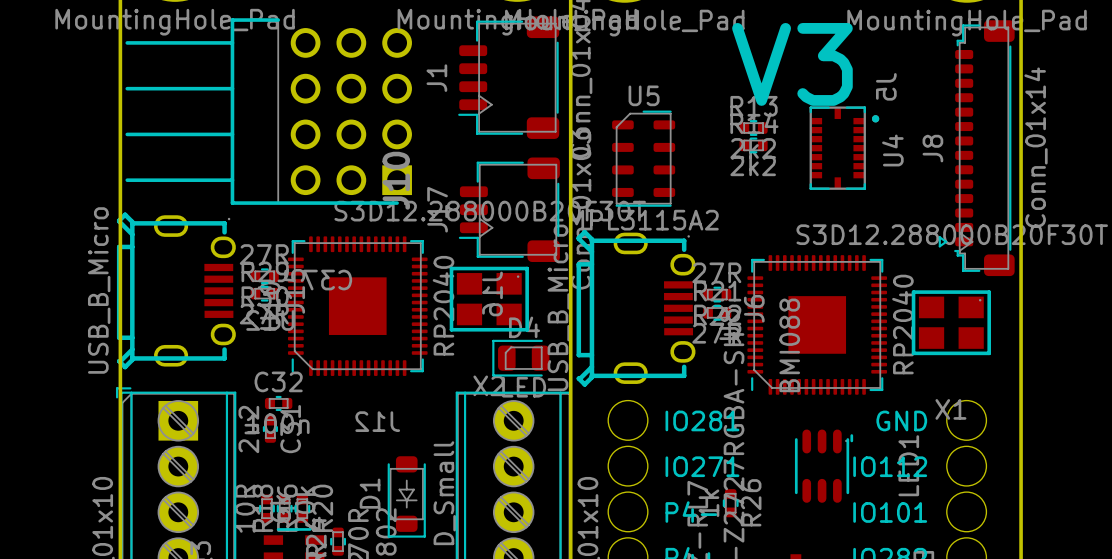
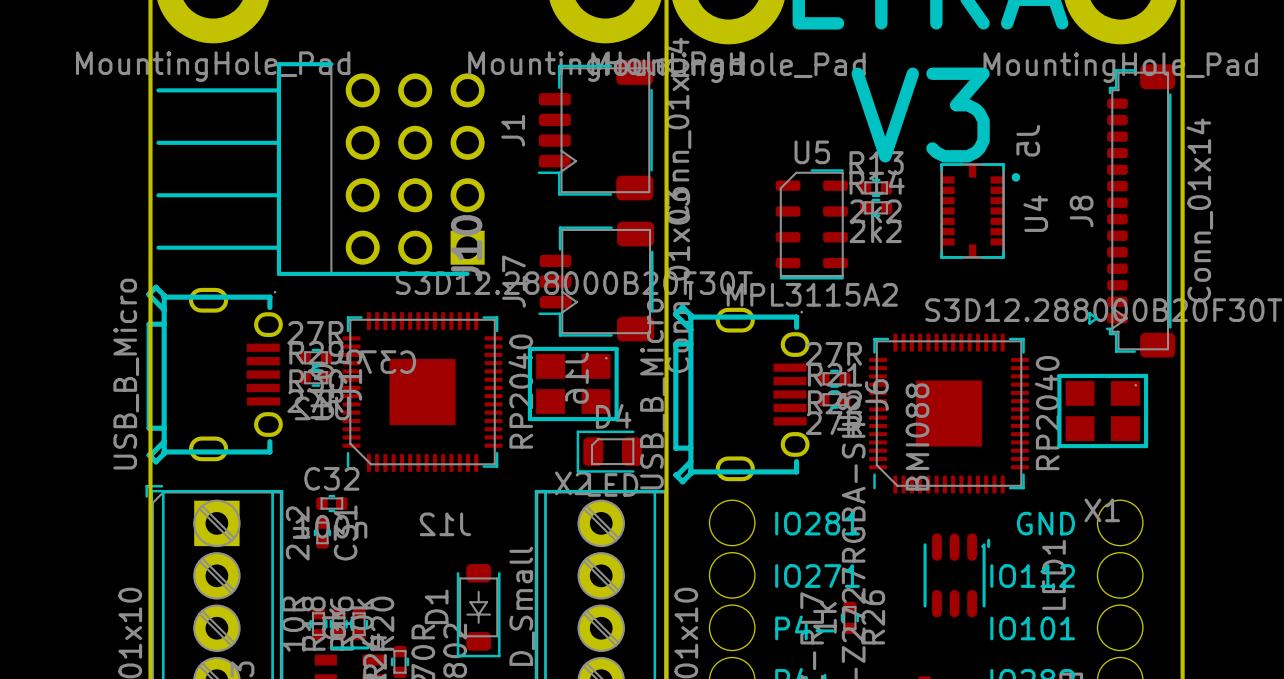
U5 position: (643, 158) -> (811, 224)

